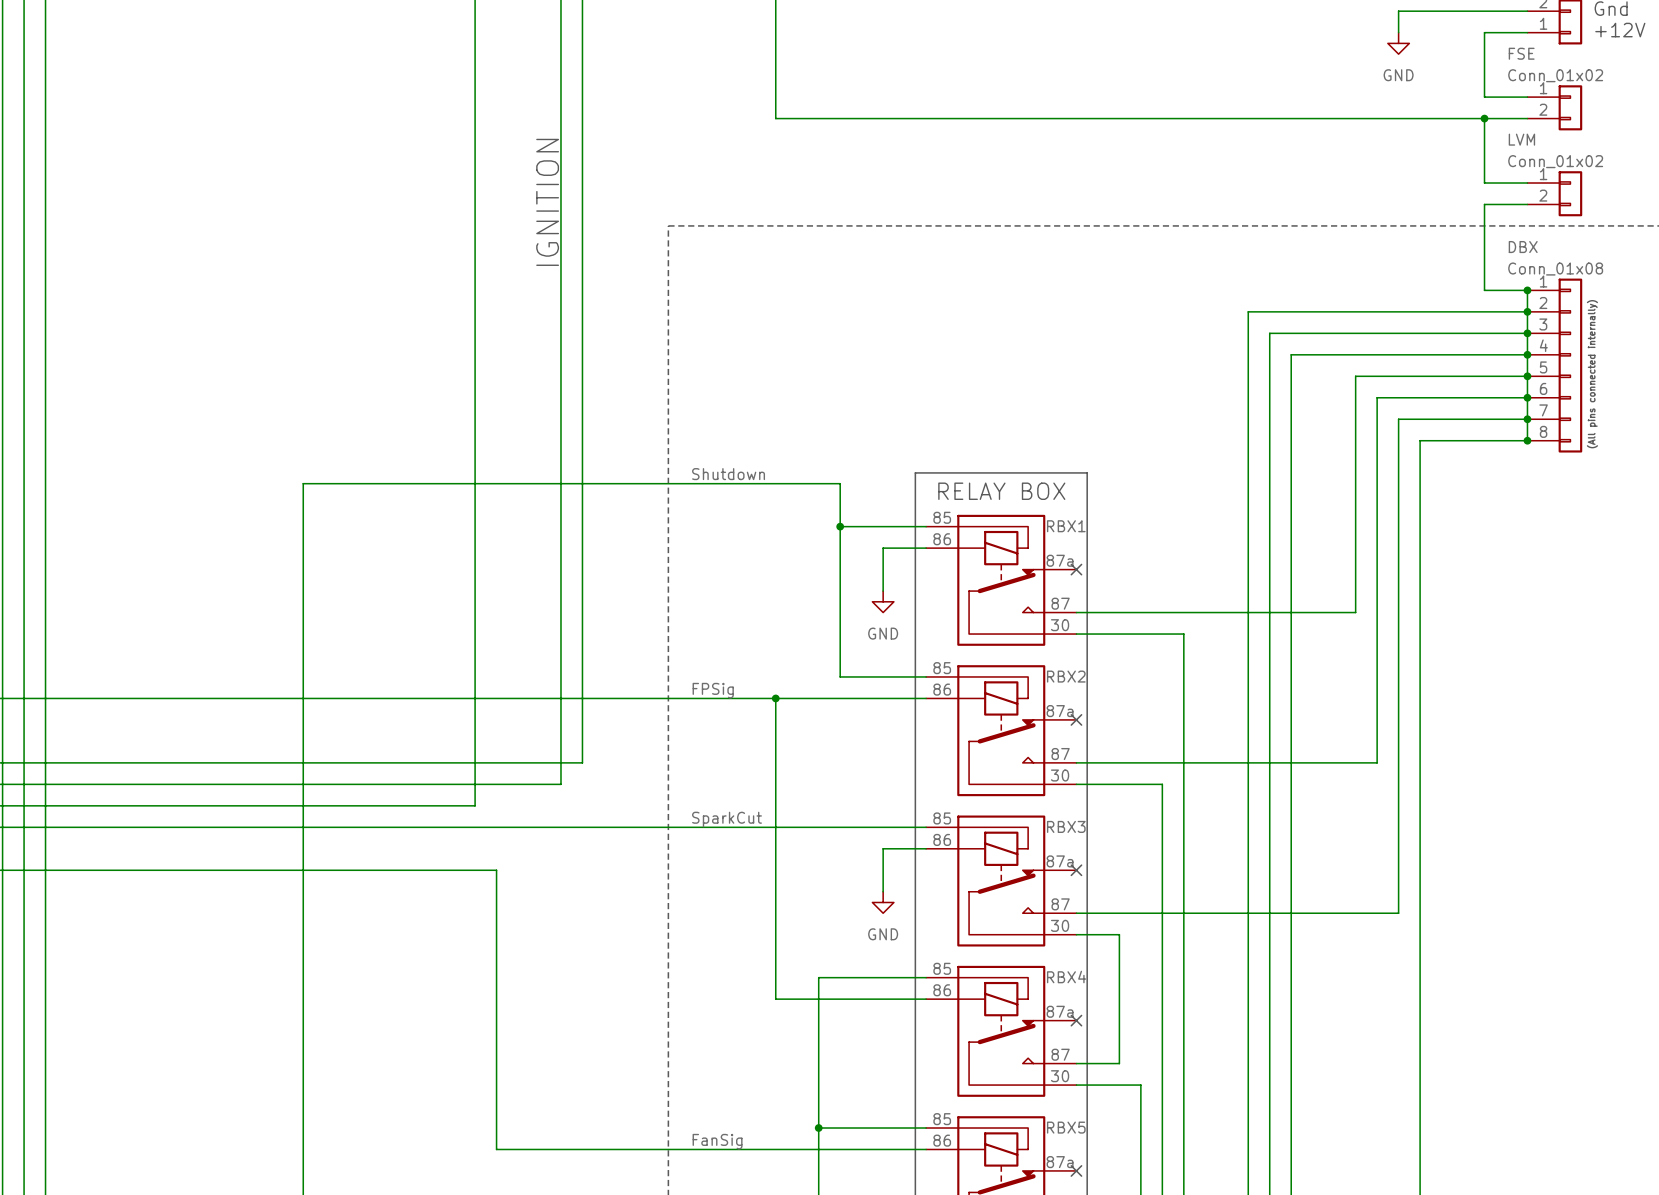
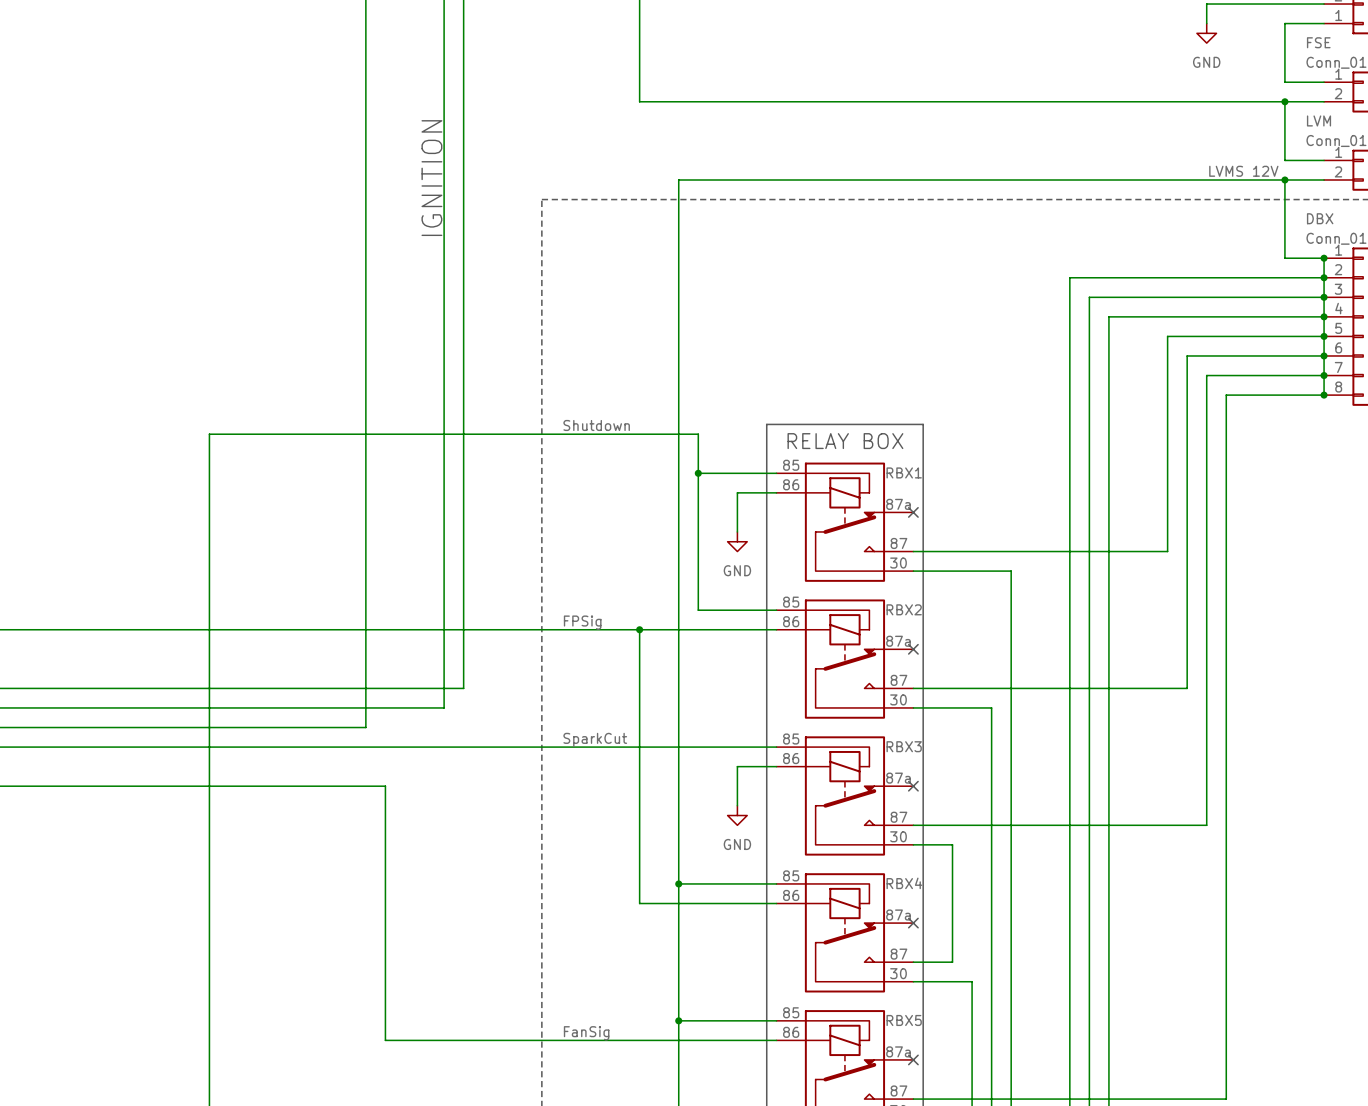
label: none -> LVMS 12V (1243, 171)
wire: none -> (1284, 180) (678, 180) (678, 883)
junction: none -> (1284, 180)
junction: none -> (678, 883)

